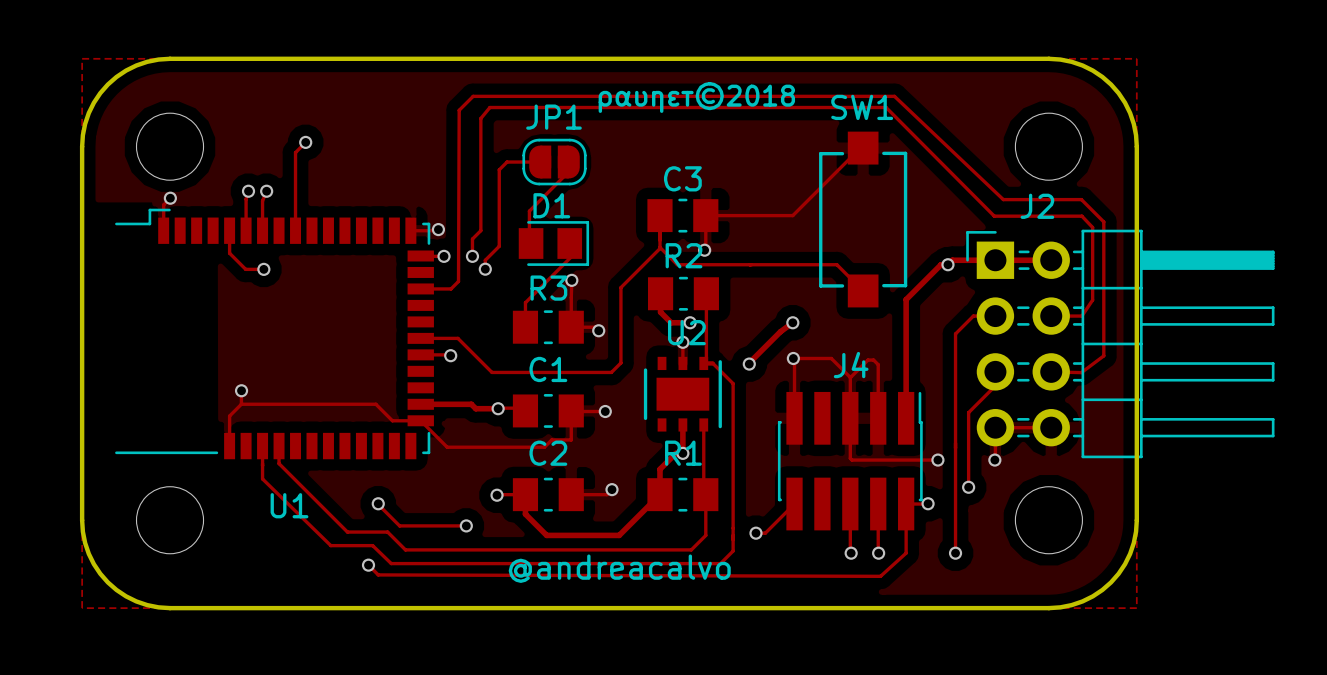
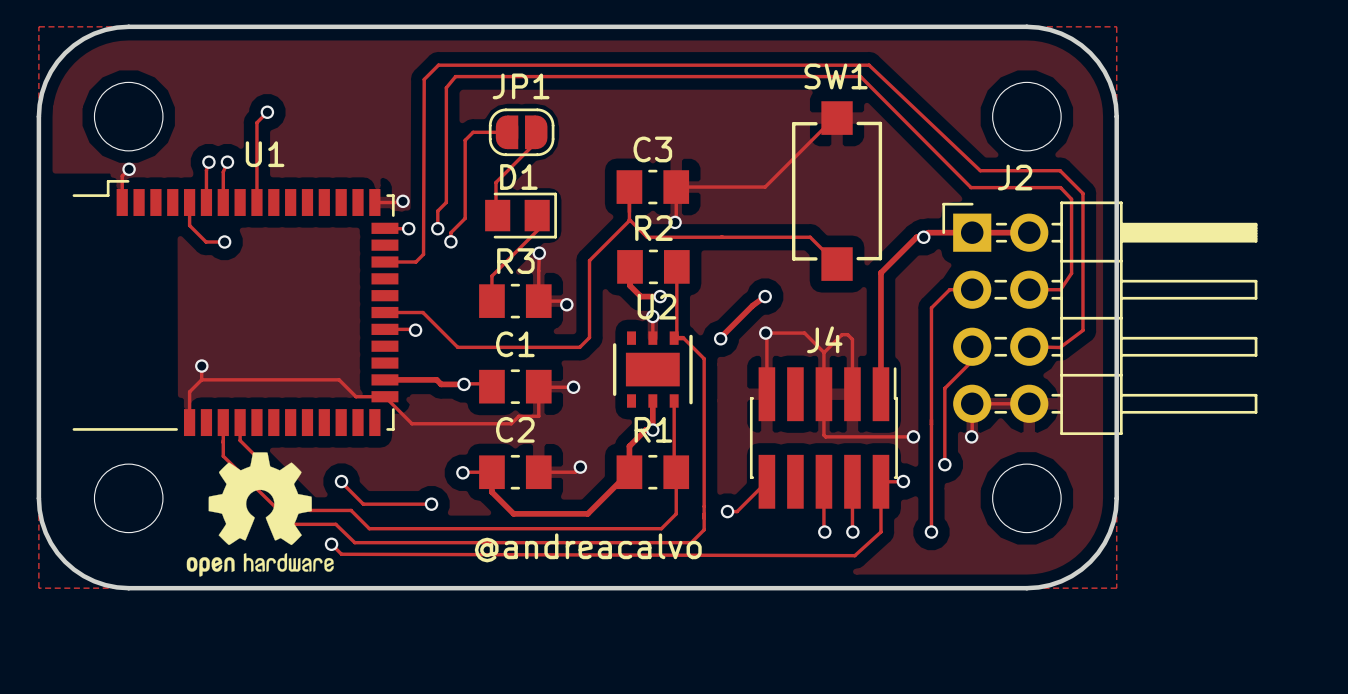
text: ραυηεт©2018 (696, 97) -> none
drawing: none -> [186, 452, 334, 577]
U1 name position: U1 (289, 505) -> U1 (265, 154)

